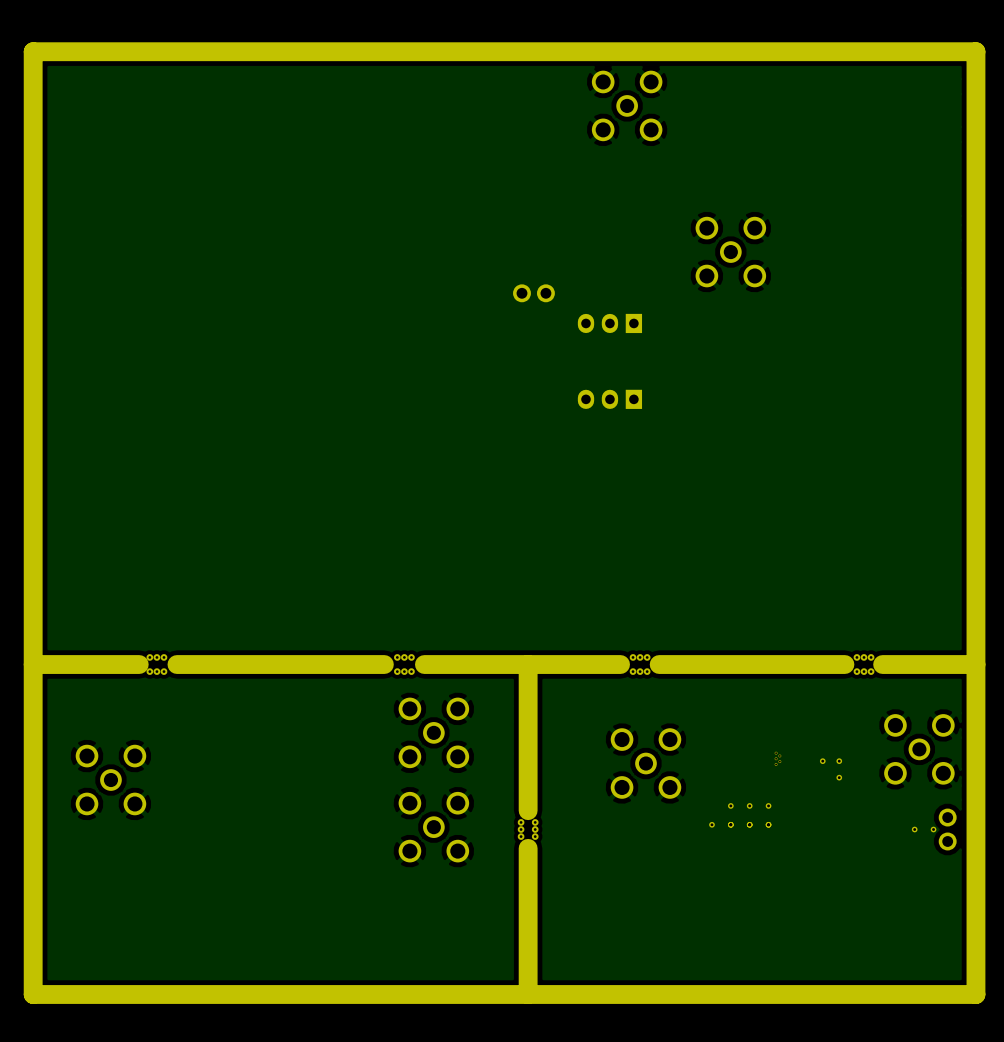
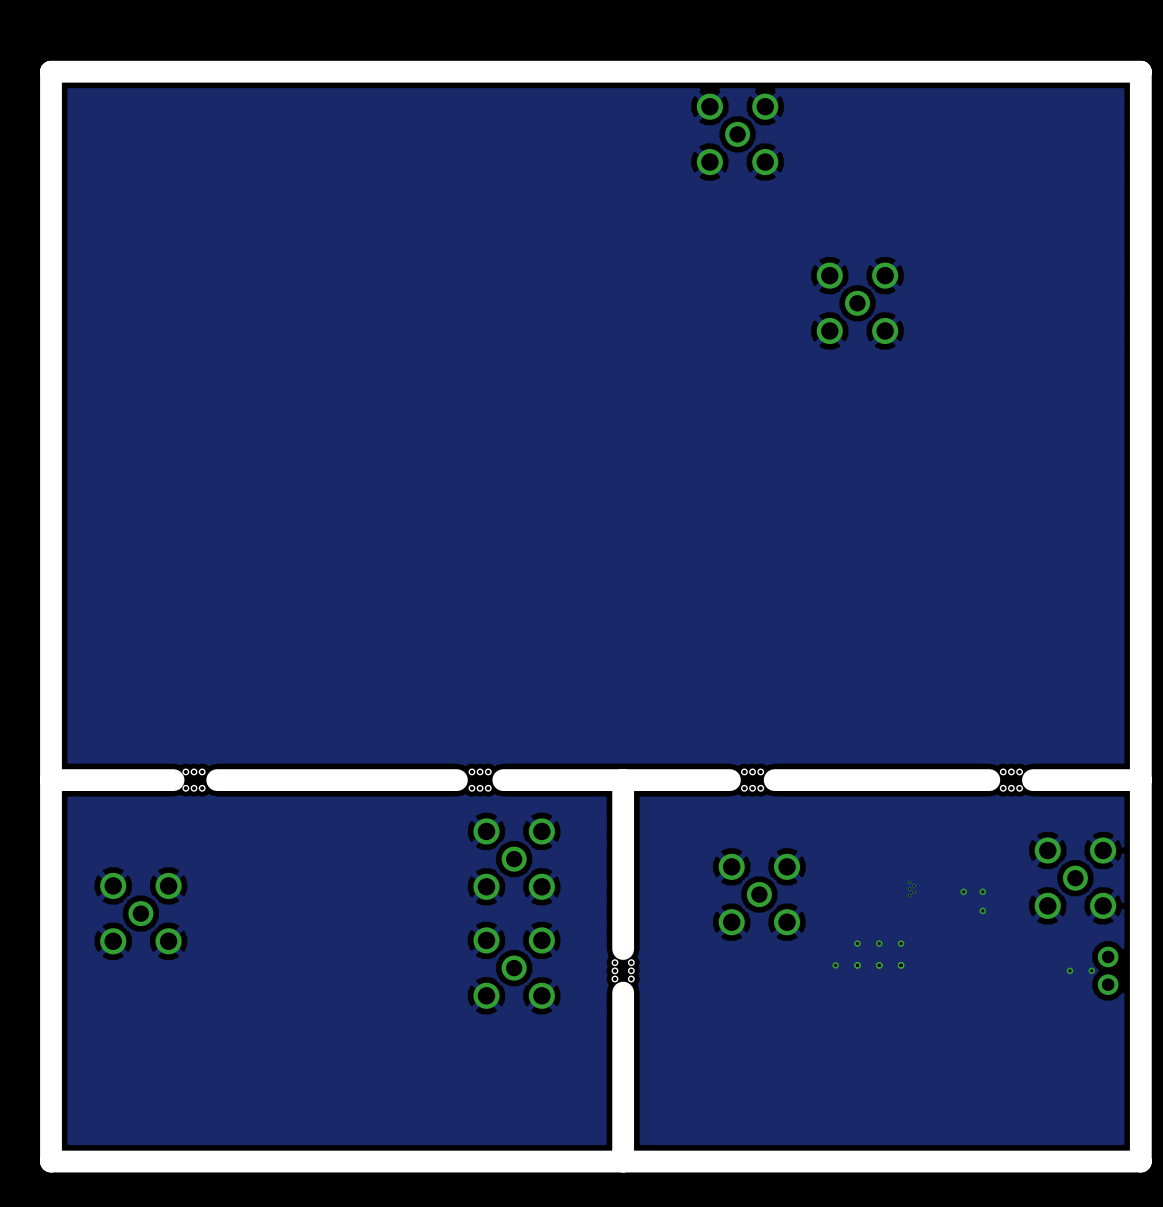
part: (533, 293) -> none
part: (609, 323) -> none
part: (609, 399) -> none

